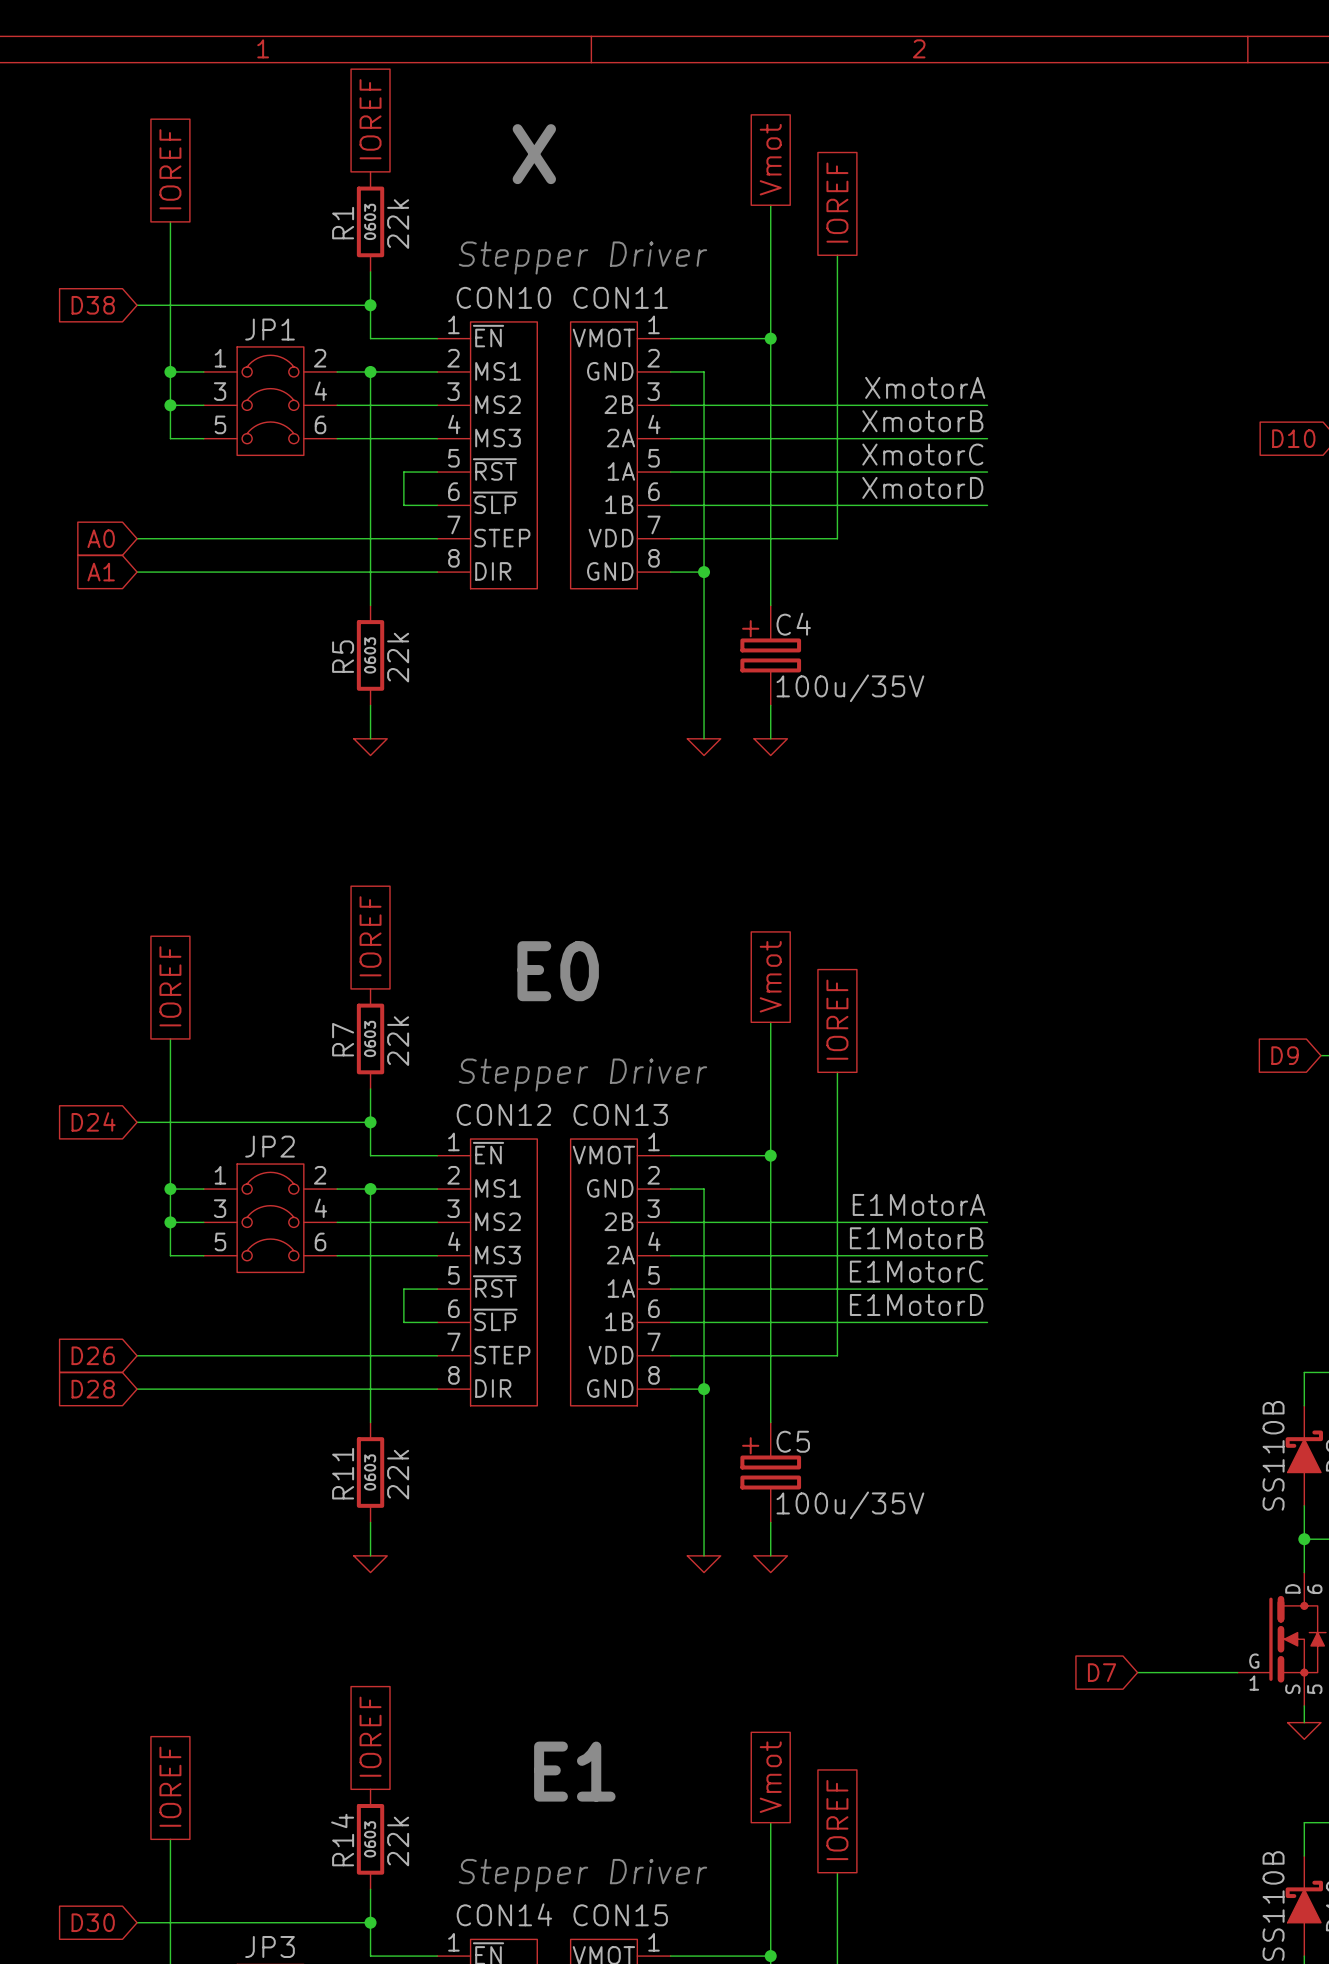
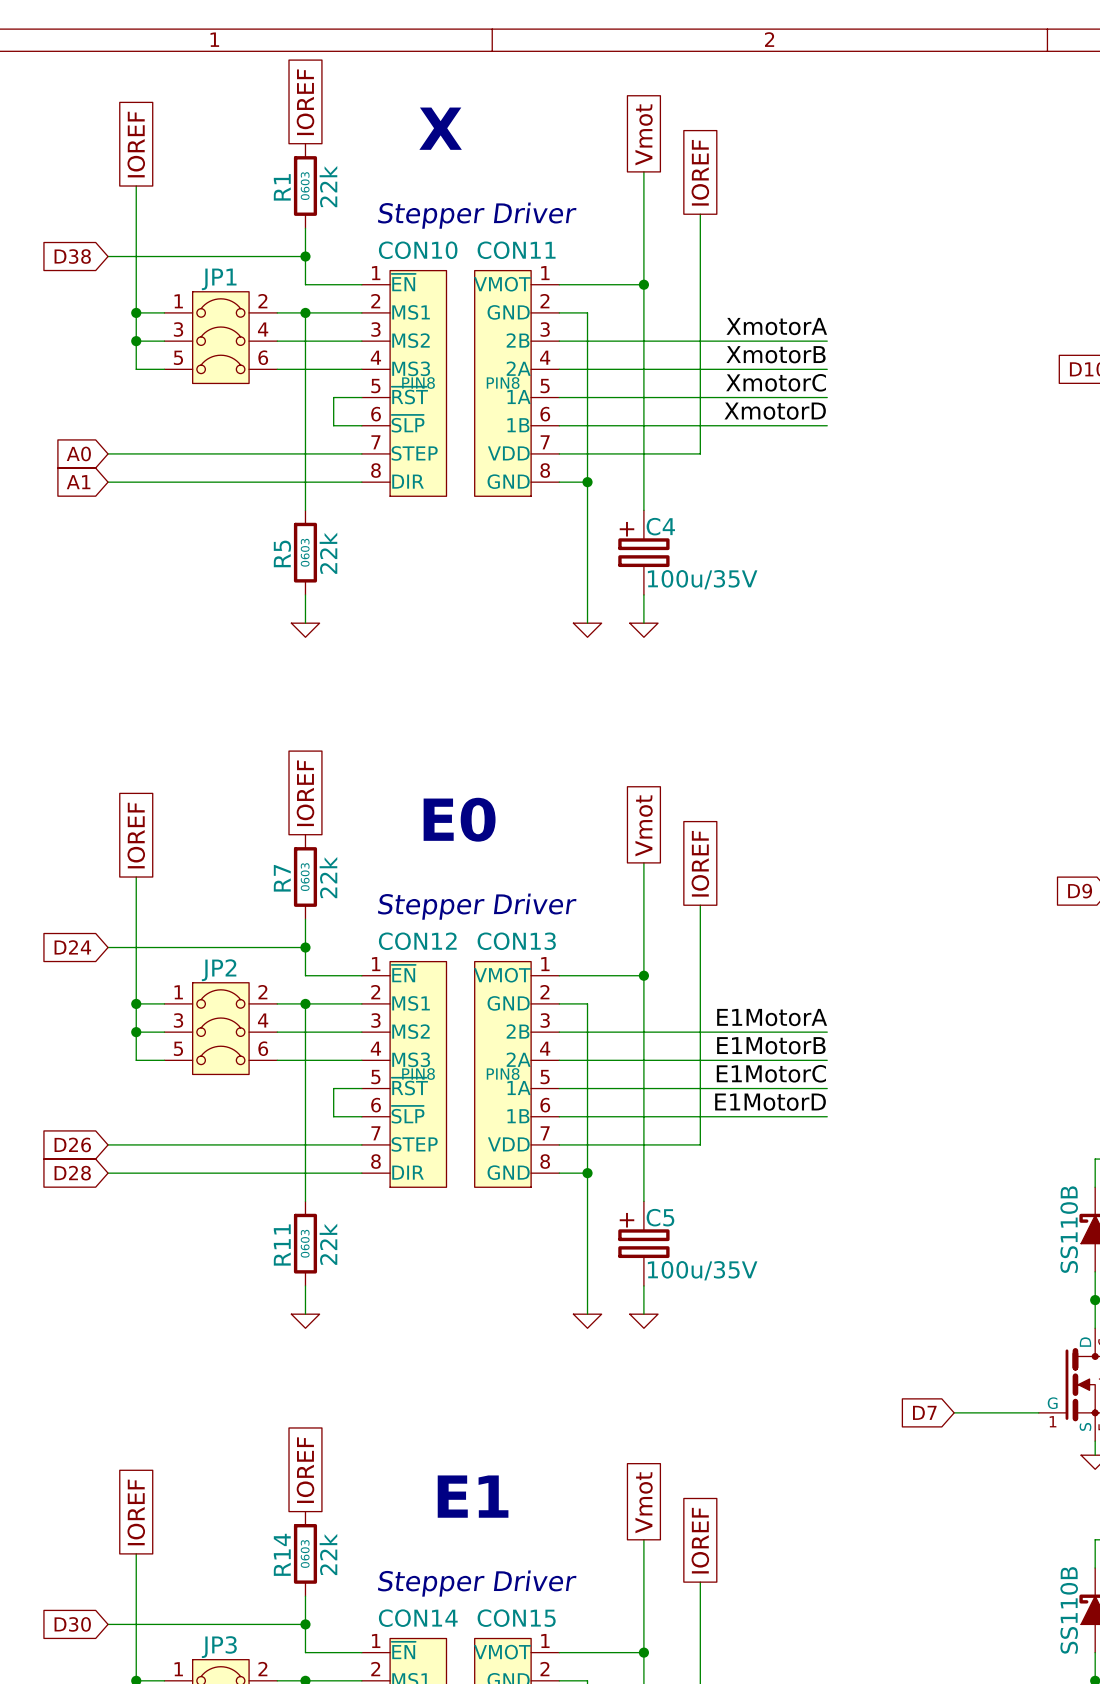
CON10 text: none -> PIN8 (418, 383)
CON11 text: none -> PIN8 (503, 383)
CON12 text: none -> PIN8 (418, 1074)
CON13 text: none -> PIN8 (503, 1074)

